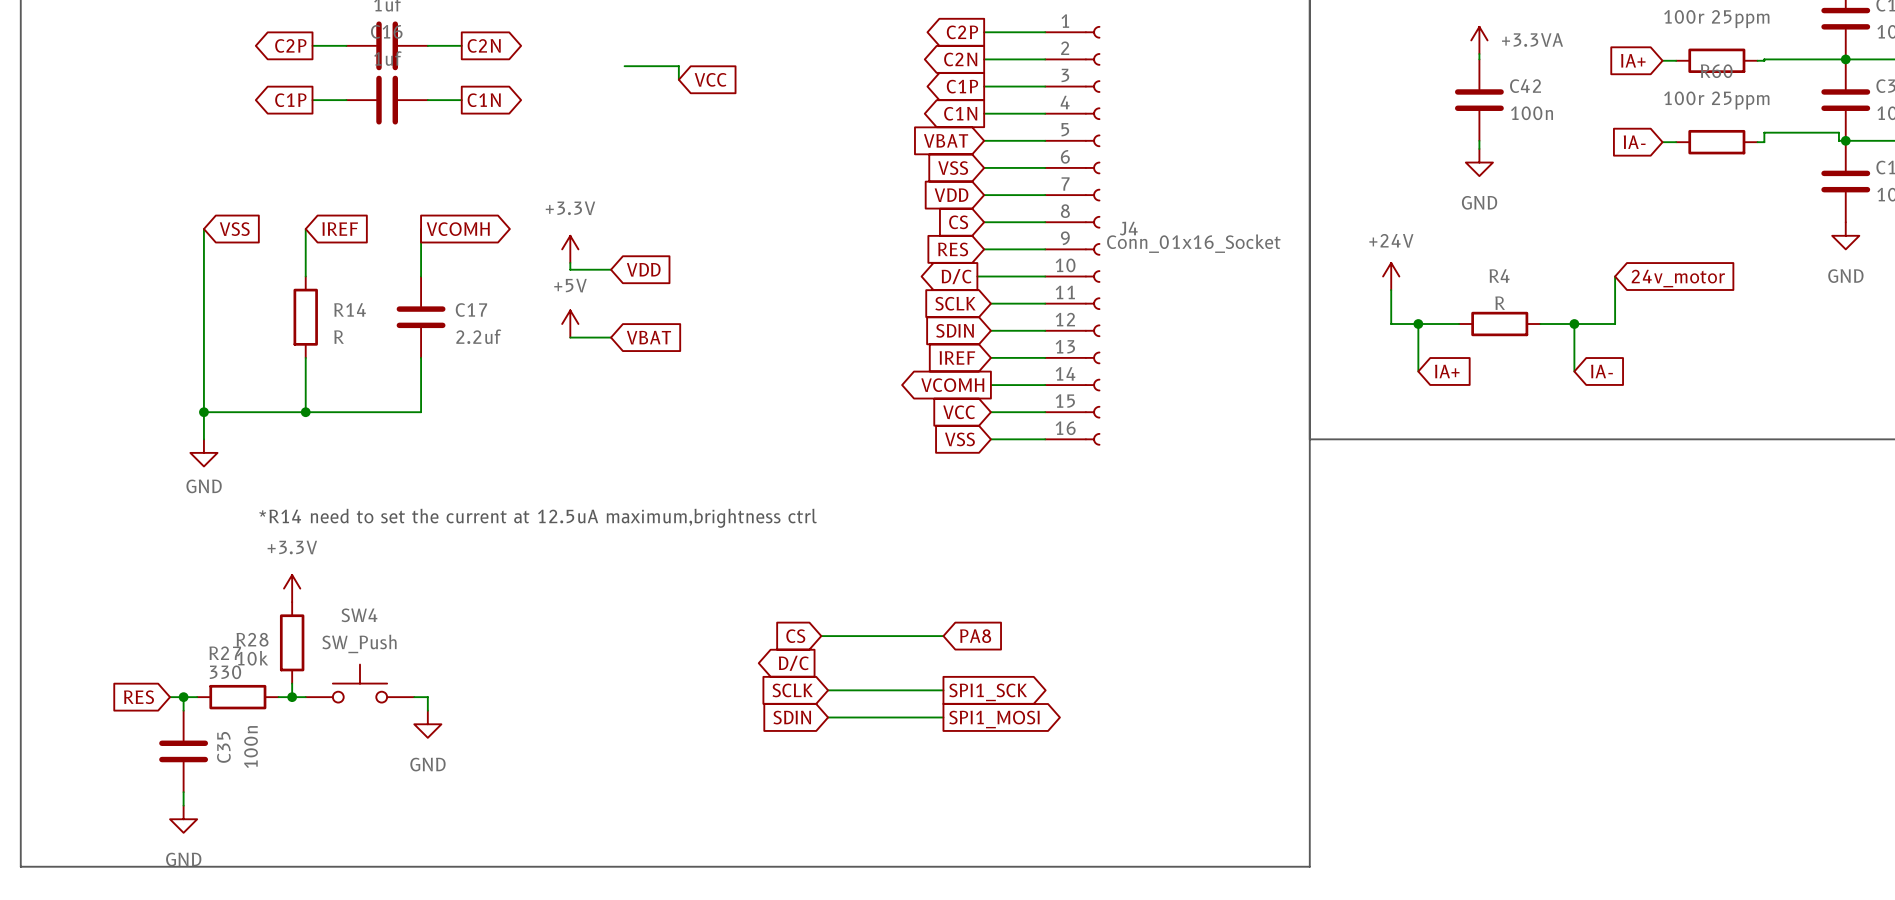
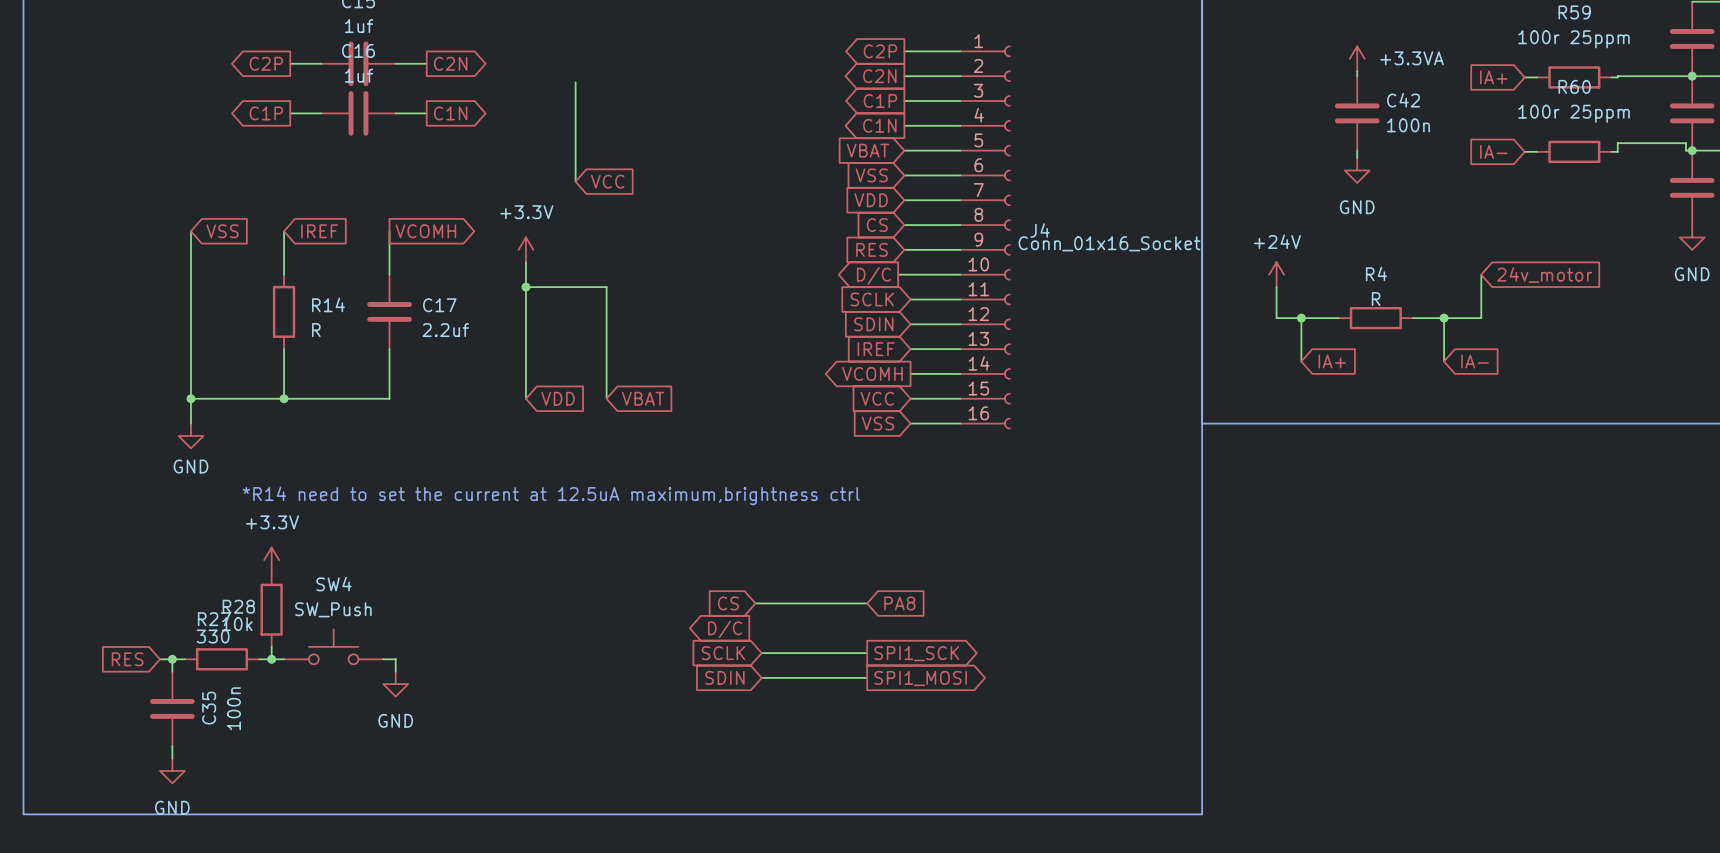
wire: (624, 66) (678, 66) (678, 79) -> (575, 82) (575, 181)
global label position: VCC (710, 79) -> VCC (607, 181)
wire: (570, 269) (611, 269) -> (525, 268) (525, 398)
global label position: VDD (643, 269) -> VDD (558, 398)
wire: none -> (525, 287) (606, 287) (606, 398)
junction: none -> (525, 287)
power symbol: +5V (570, 324) -> none
wire: (570, 337) (611, 337) -> none
global label position: VBAT (648, 337) -> VBAT (643, 398)

